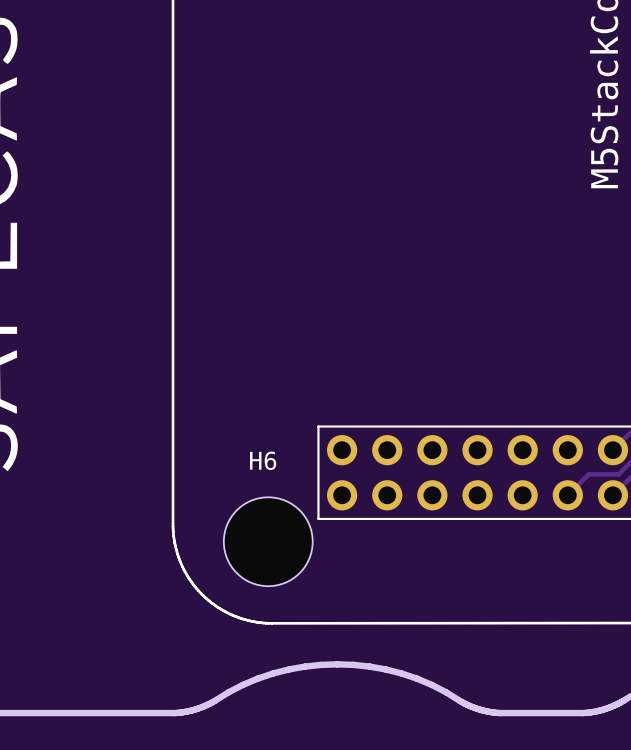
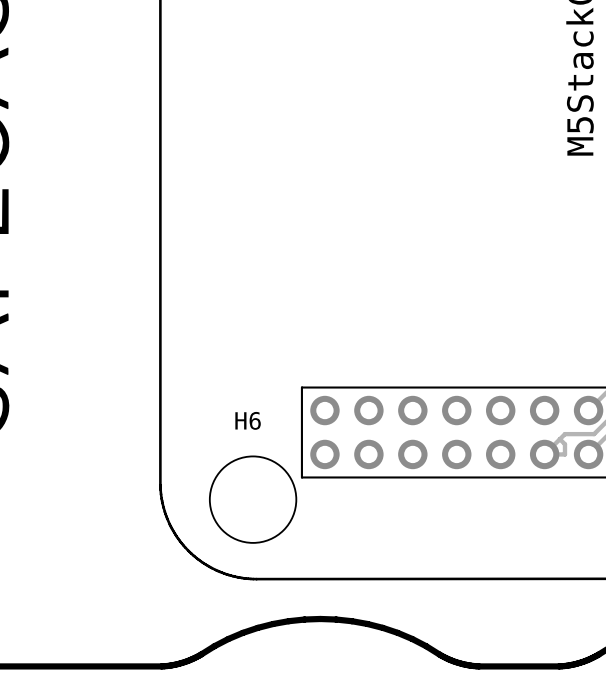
track: none -> (559, 439) (564, 444) (564, 454) (544, 454)

